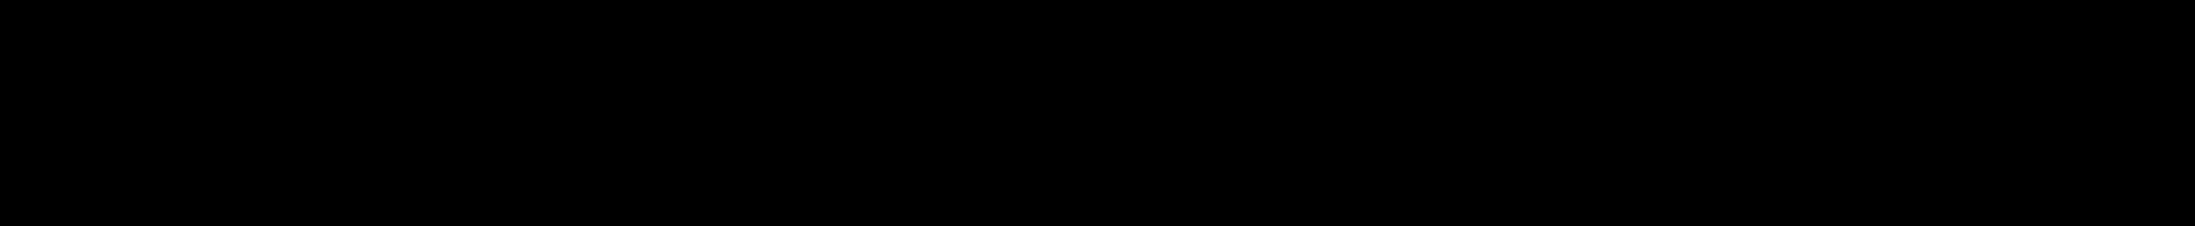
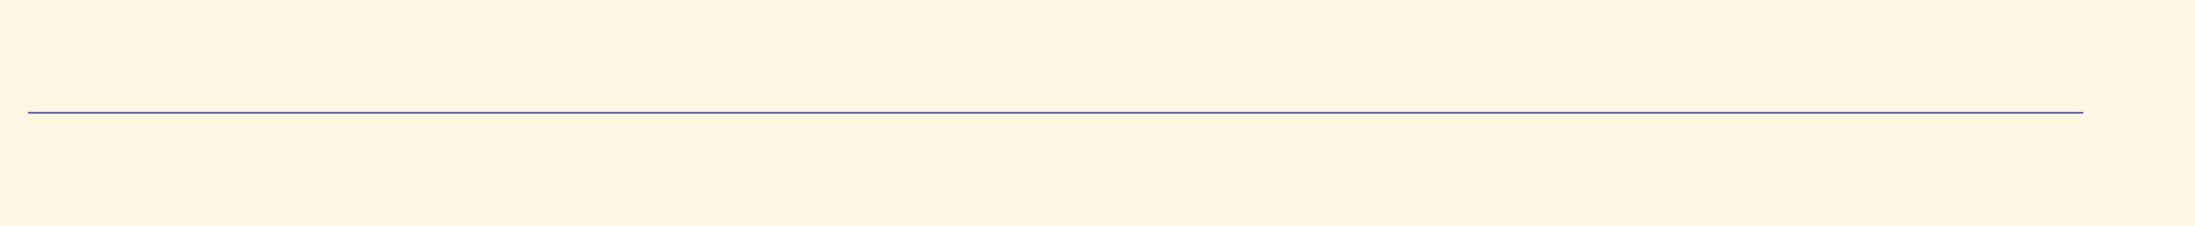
line: none -> (28, 112) (2082, 112)

